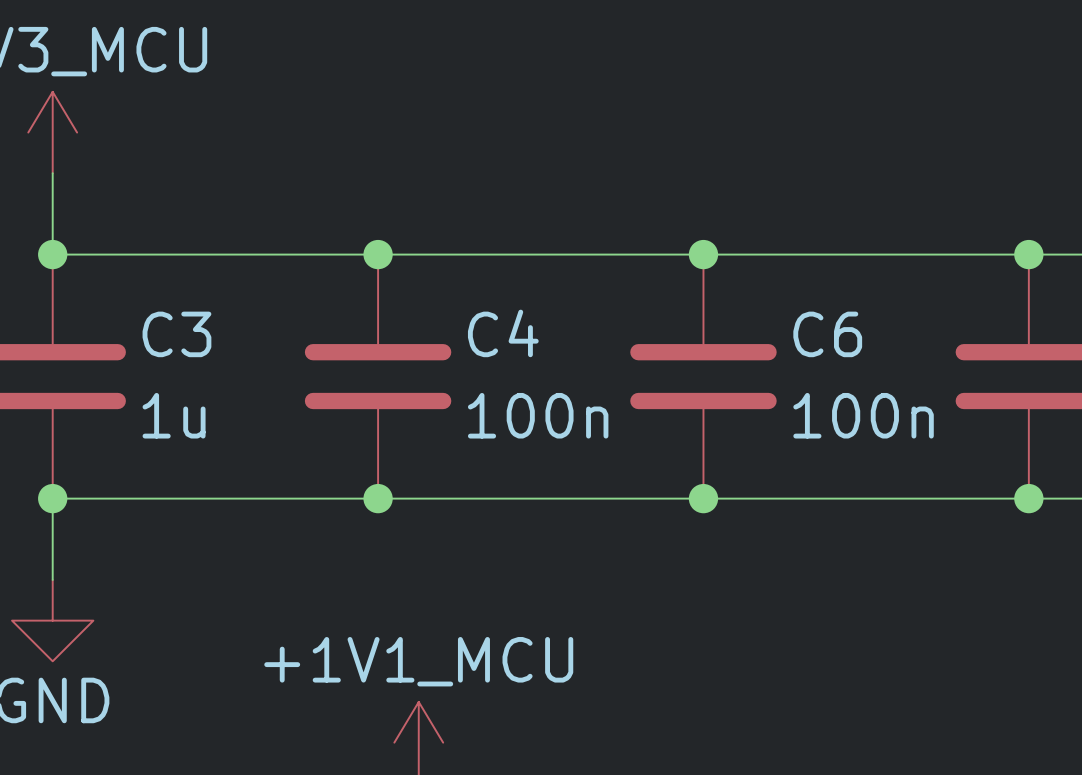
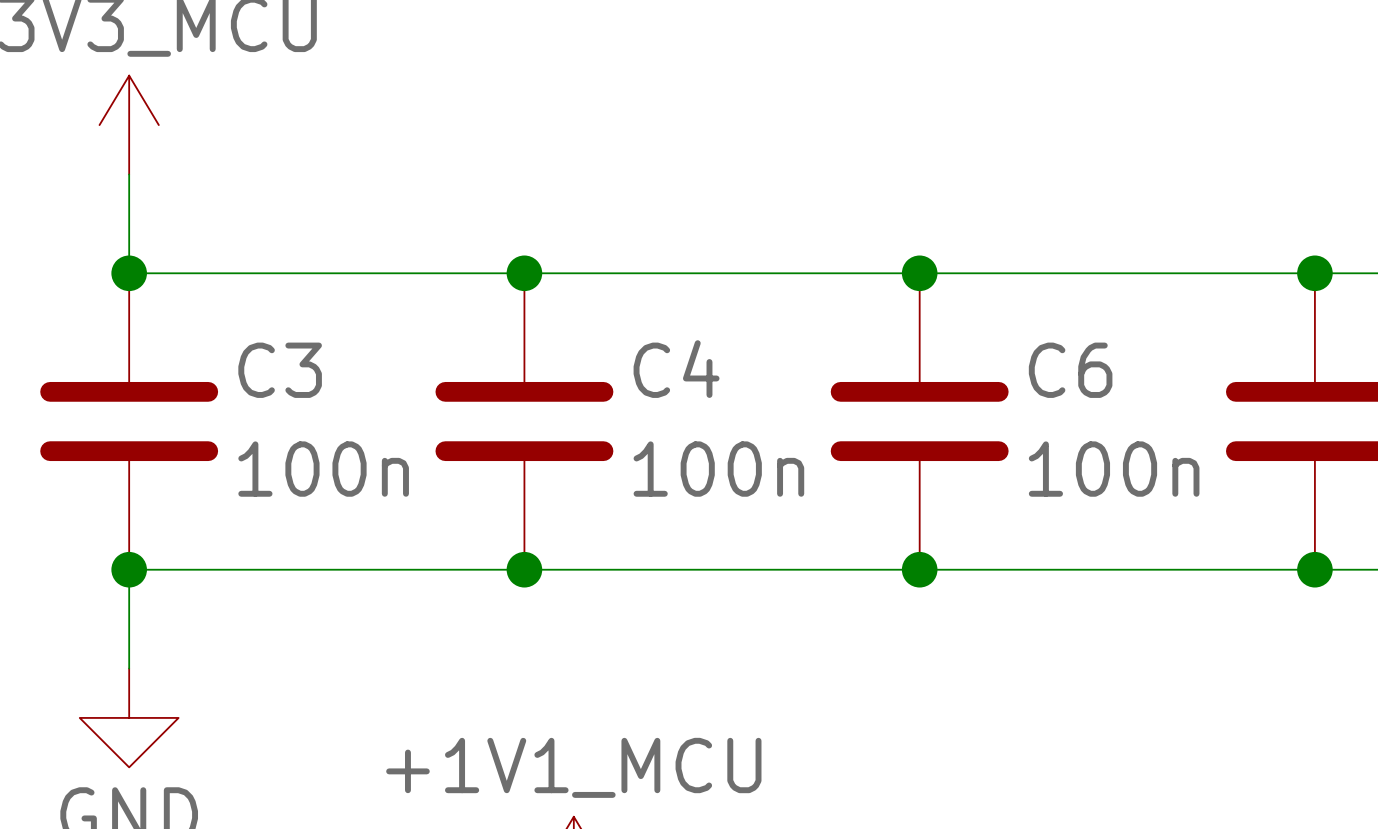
C3 value: 1u (174, 415) -> 100n (323, 469)

